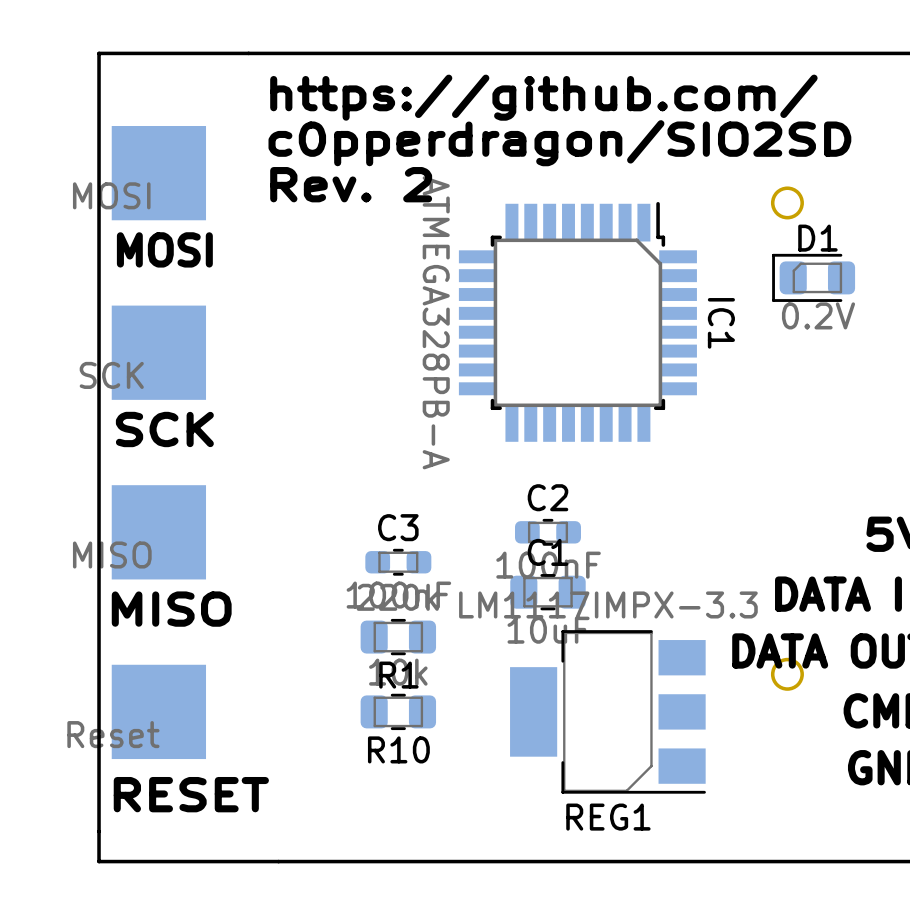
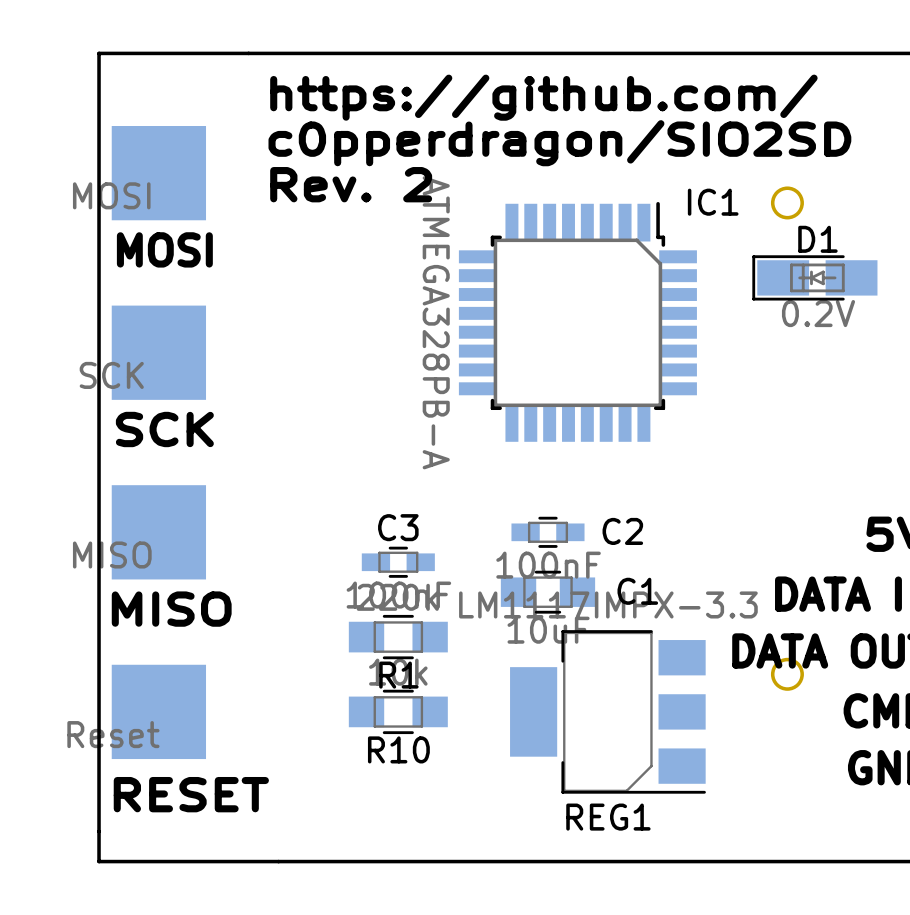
D1 footprint: [772, 253, 856, 302] -> [752, 255, 878, 301]
IC1 name rotation: 0° (721, 323) -> 90° counterclockwise (713, 202)
IC1 name position: IC1 (721, 323) -> IC1 (713, 202)
C2 name position: C2 (547, 497) -> C2 (622, 531)
C2 footprint: [514, 518, 581, 546] -> [511, 516, 585, 548]
C3 footprint: [365, 548, 432, 576] -> [361, 546, 435, 578]
C1 name position: C1 (547, 552) -> C1 (637, 591)
C1 footprint: [510, 574, 586, 611] -> [500, 570, 596, 614]
R1 footprint: [360, 618, 437, 656] -> [348, 614, 448, 660]
R10 footprint: [360, 693, 437, 731] -> [348, 689, 448, 735]

